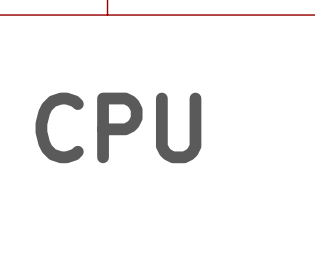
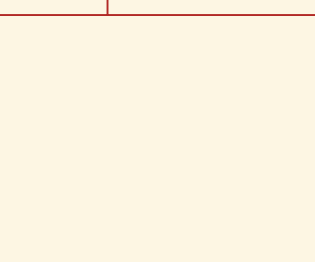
text: CPU (118, 127) -> none

